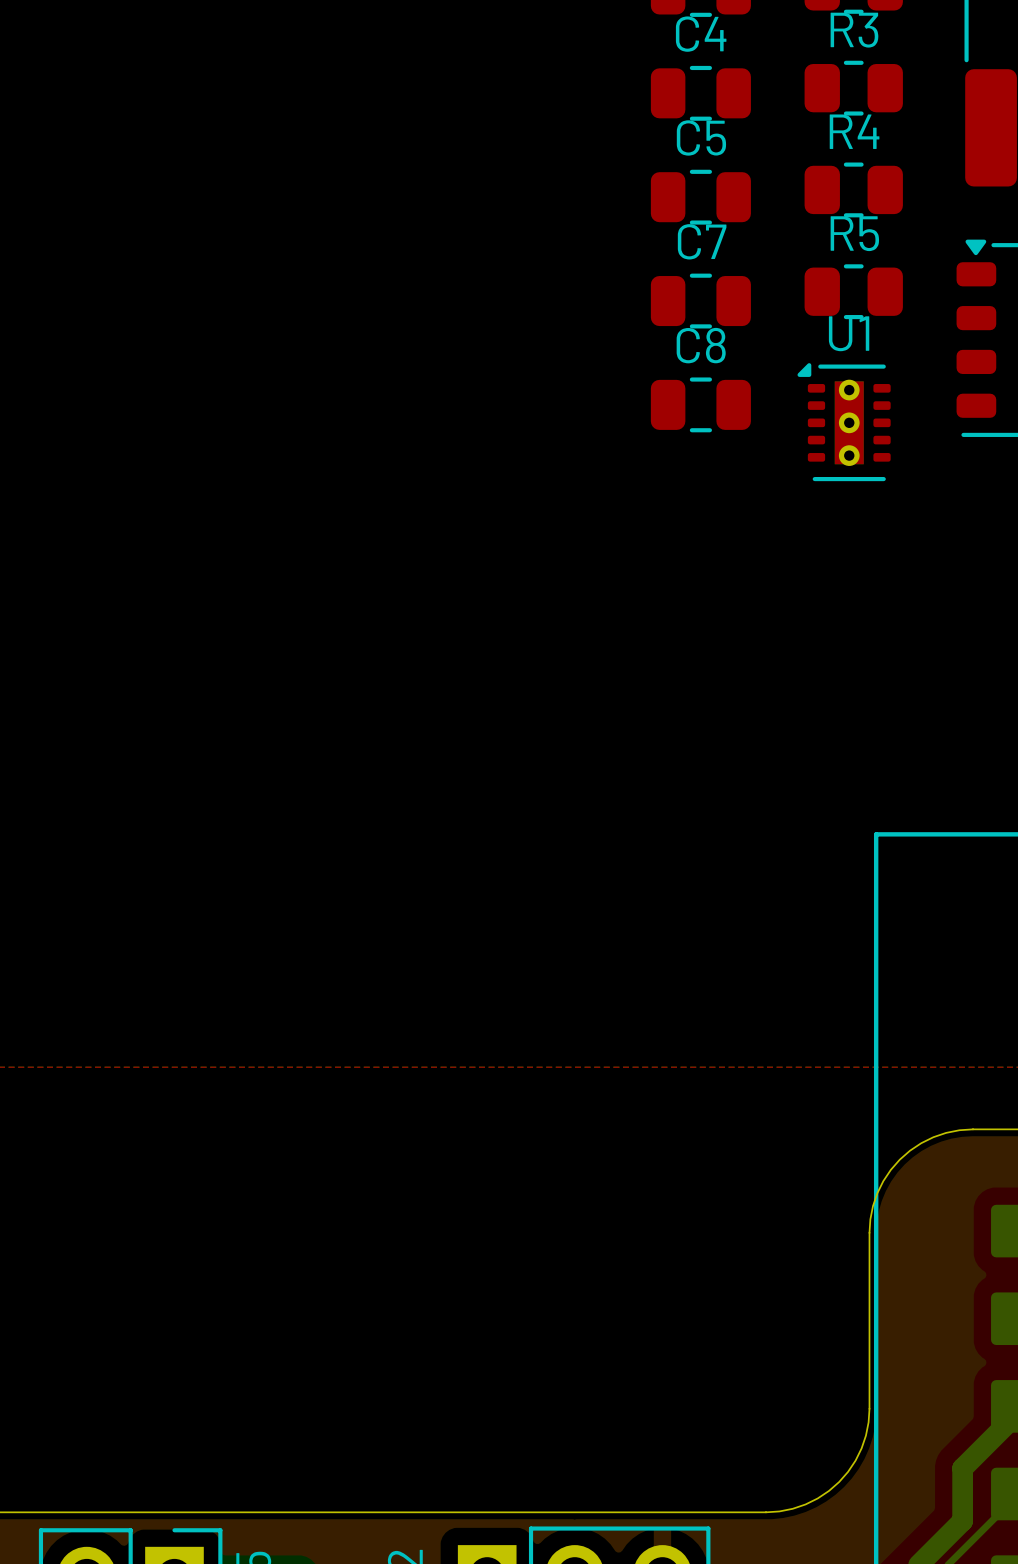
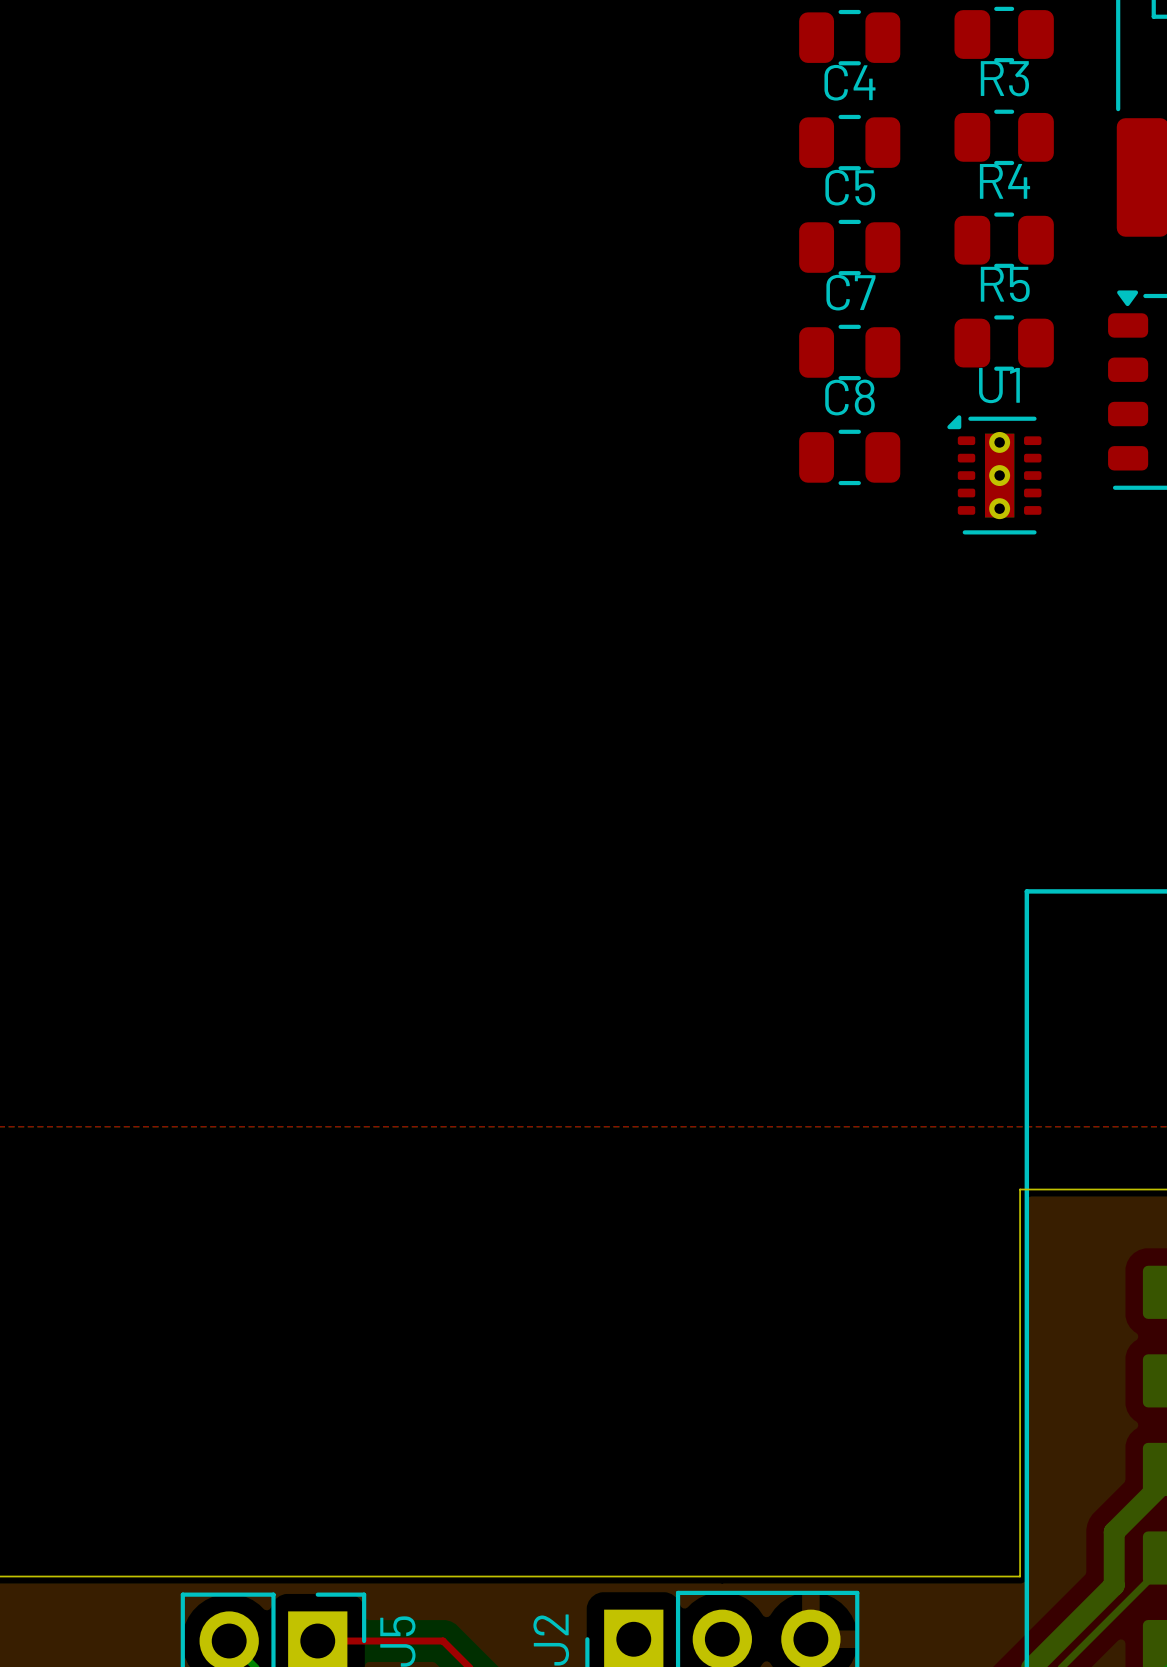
board edge: (972, 1129) (959, 1130) (933, 1137) (921, 1143) (899, 1159) (890, 1169) (877, 1193) (873, 1206) (869, 1232) -> (1124, 1189) (1020, 1189) (1020, 1294)
board edge: (869, 1408) (865, 1435) (861, 1448) (855, 1460) (839, 1482) (828, 1490) (805, 1504) (792, 1508) (765, 1512) -> (1020, 1471) (1020, 1576) (915, 1576)

